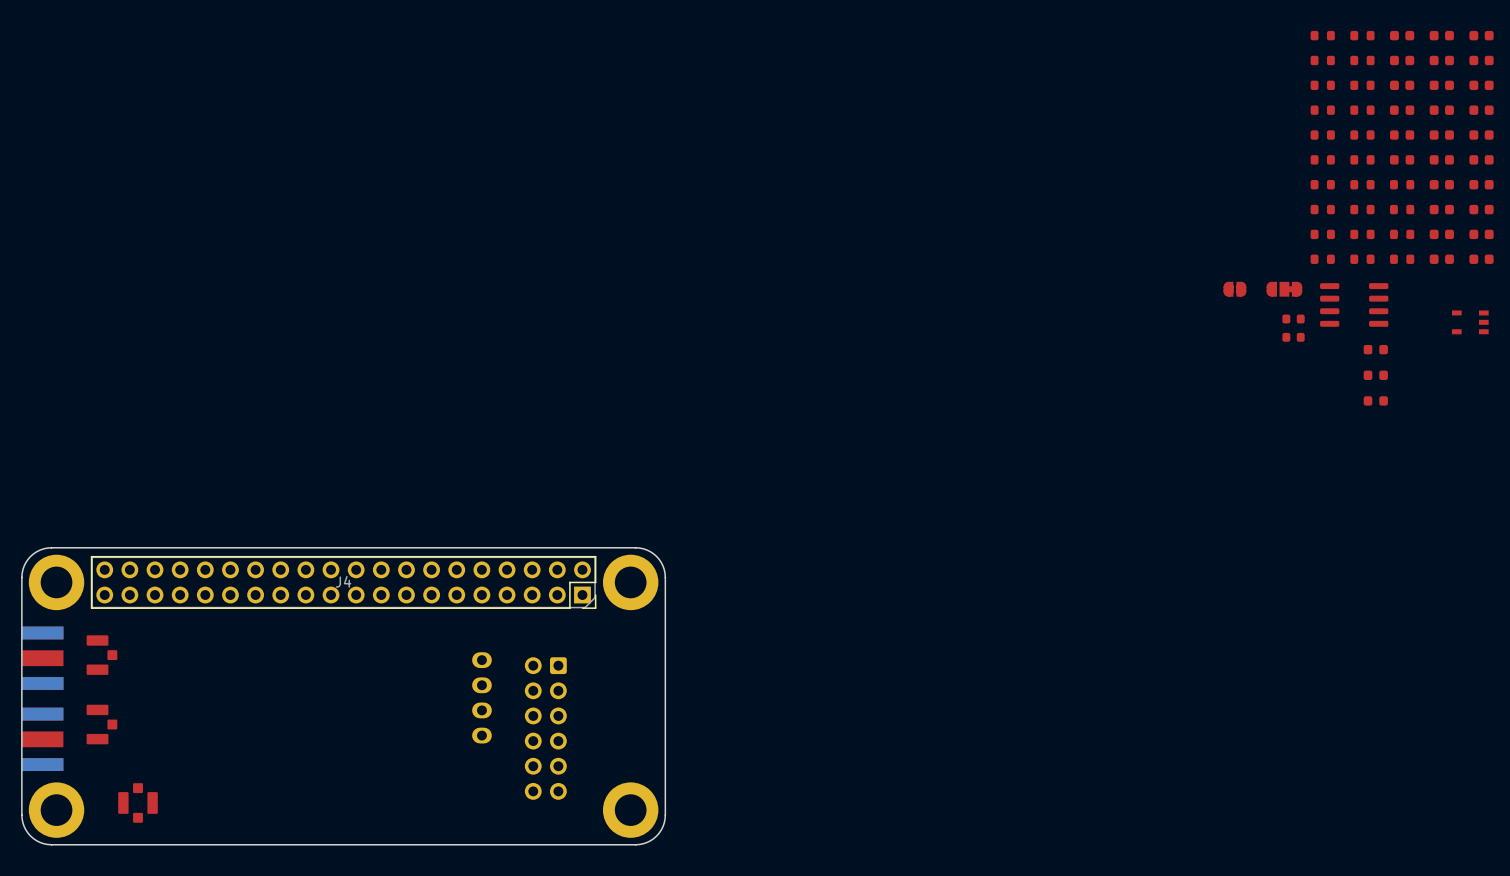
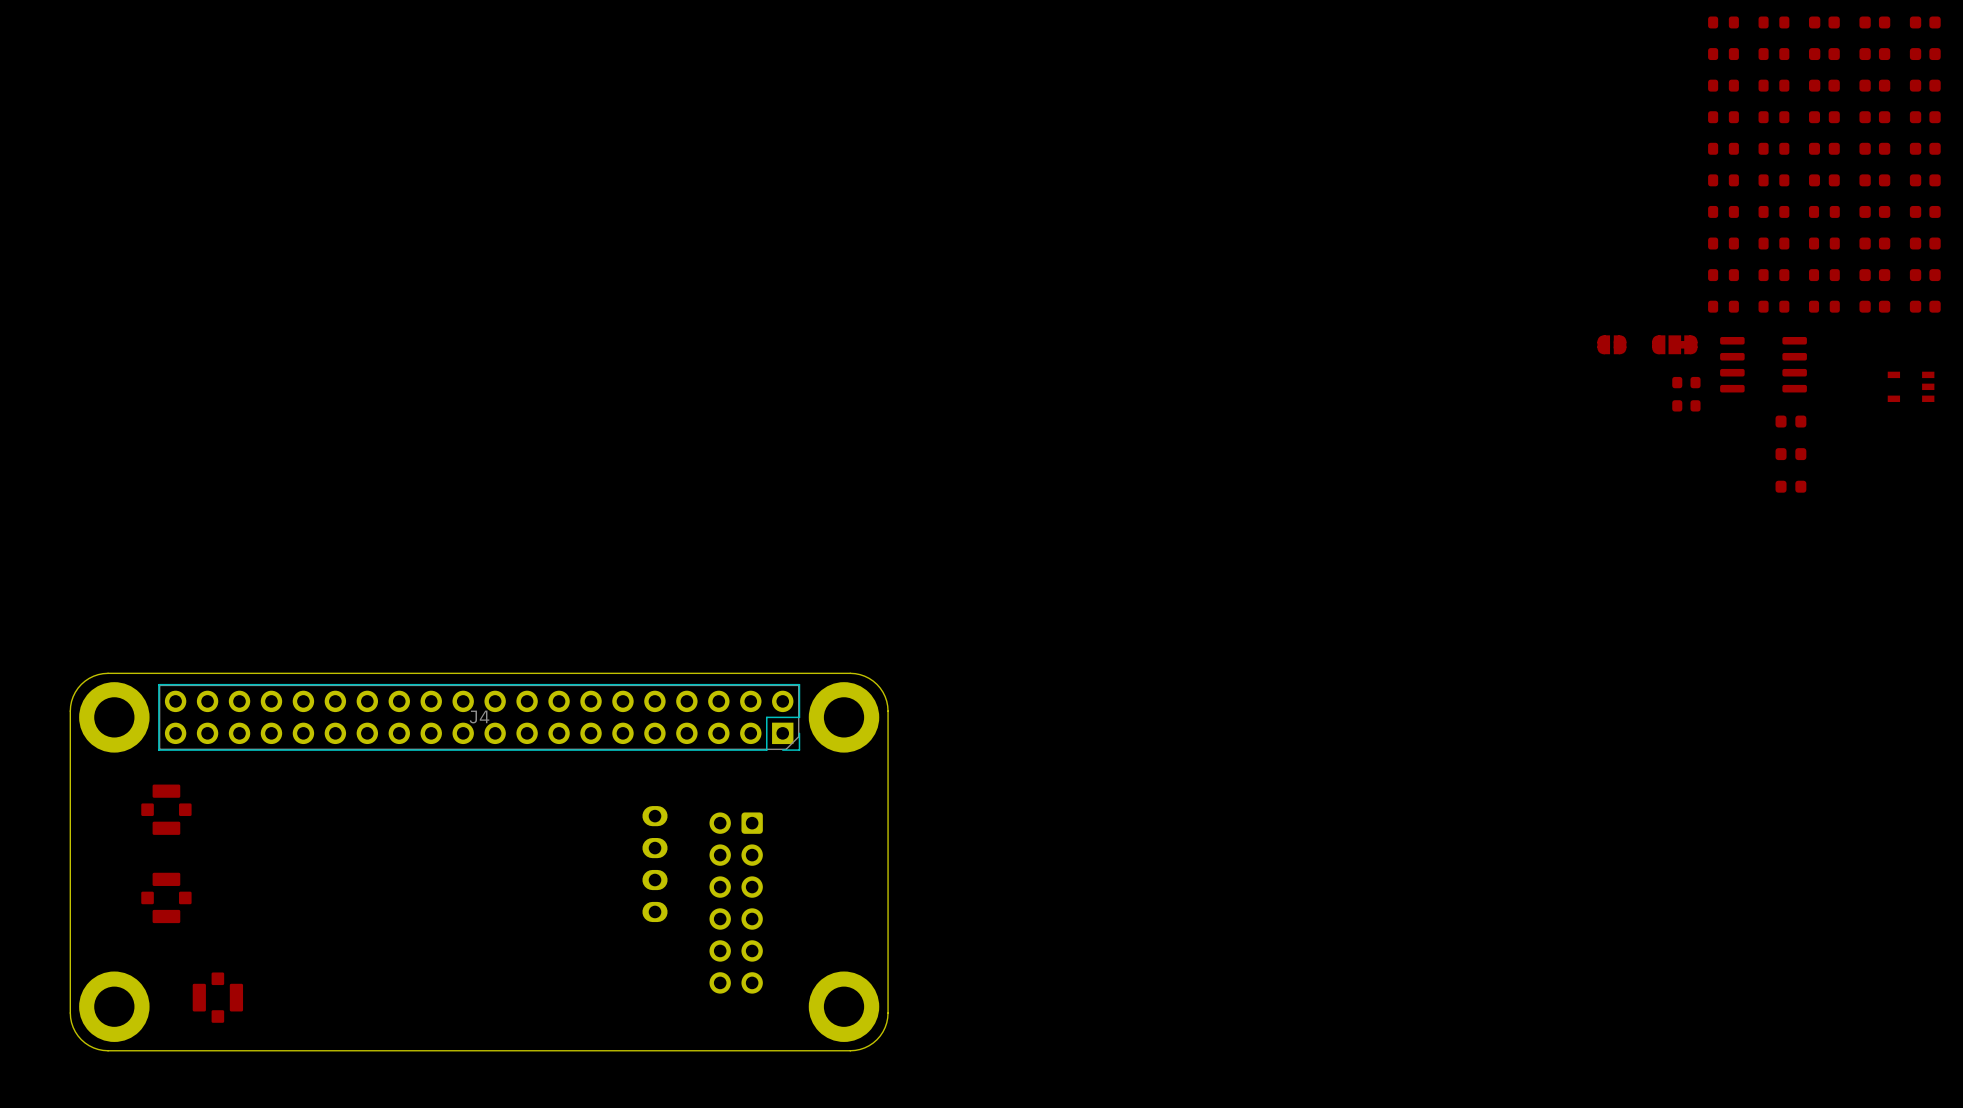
part footprint: [86, 635, 118, 675] -> [141, 784, 192, 835]
part: (42, 658) -> none
part footprint: [86, 704, 118, 745] -> [141, 872, 192, 924]
part: (42, 739) -> none

